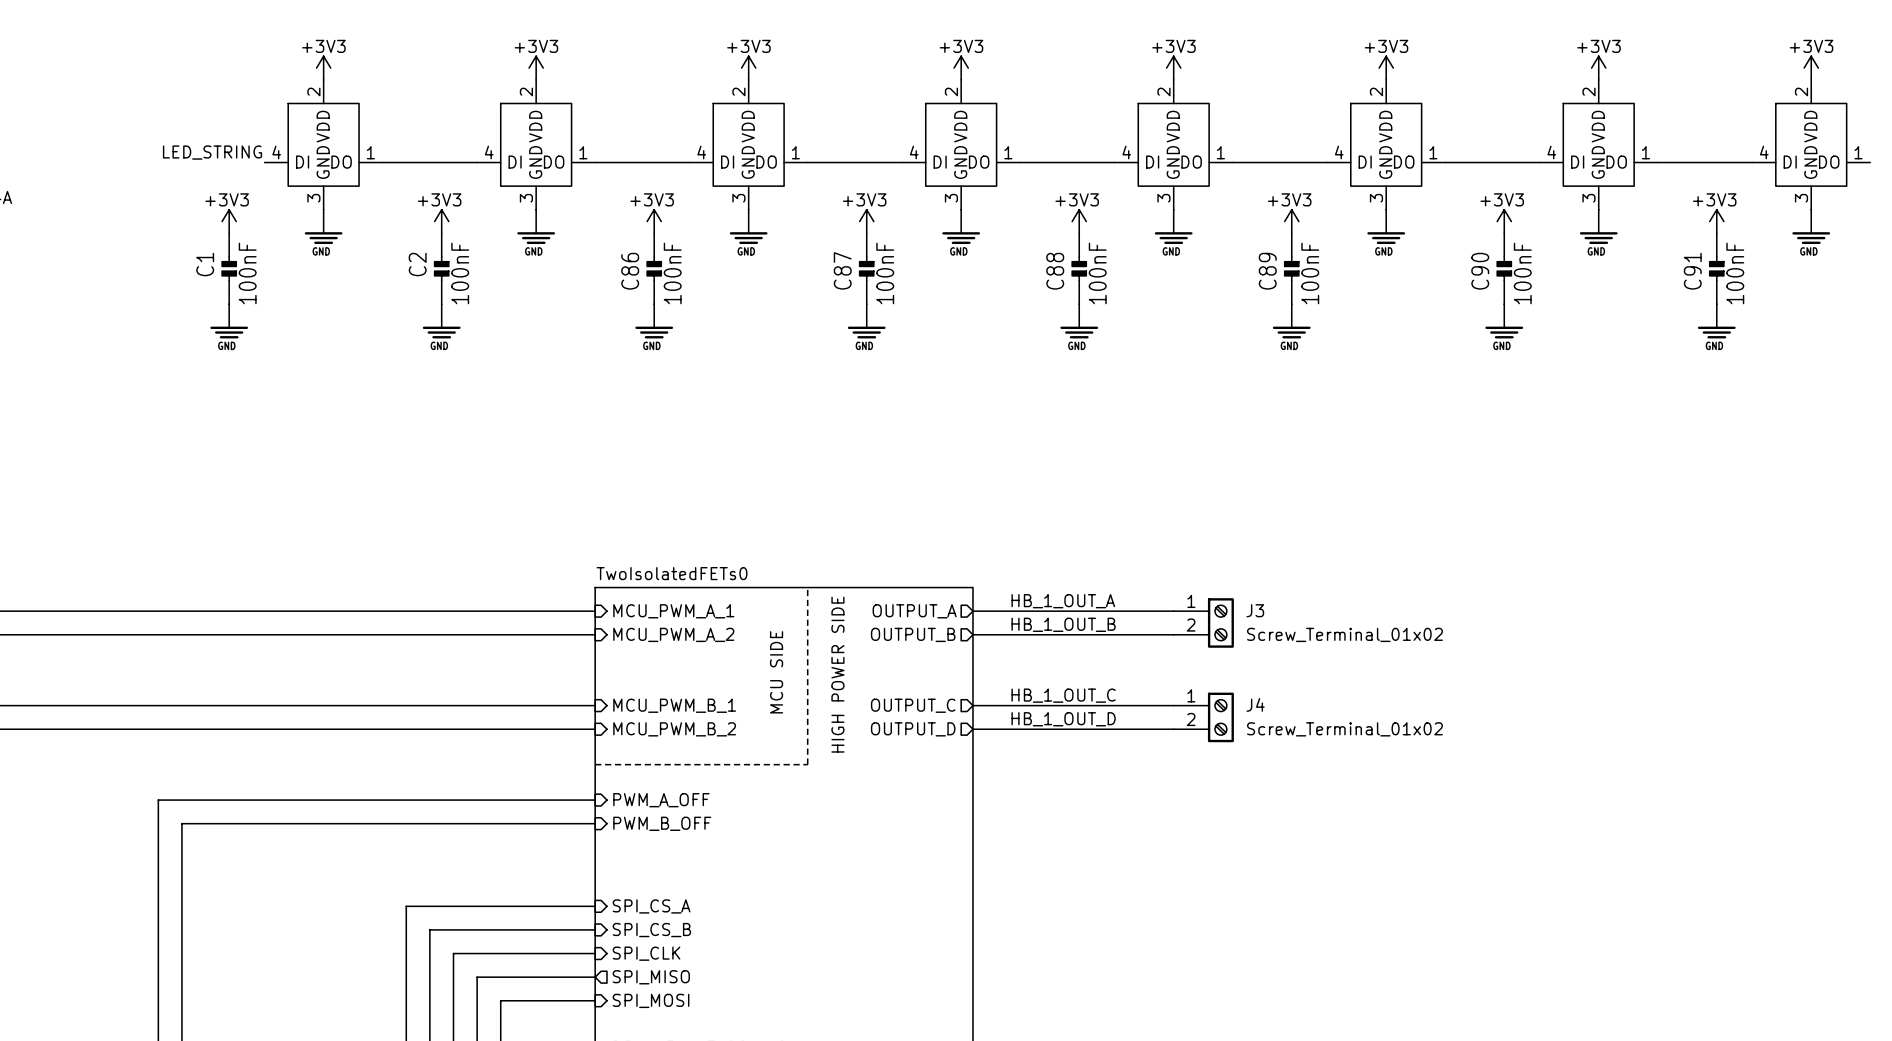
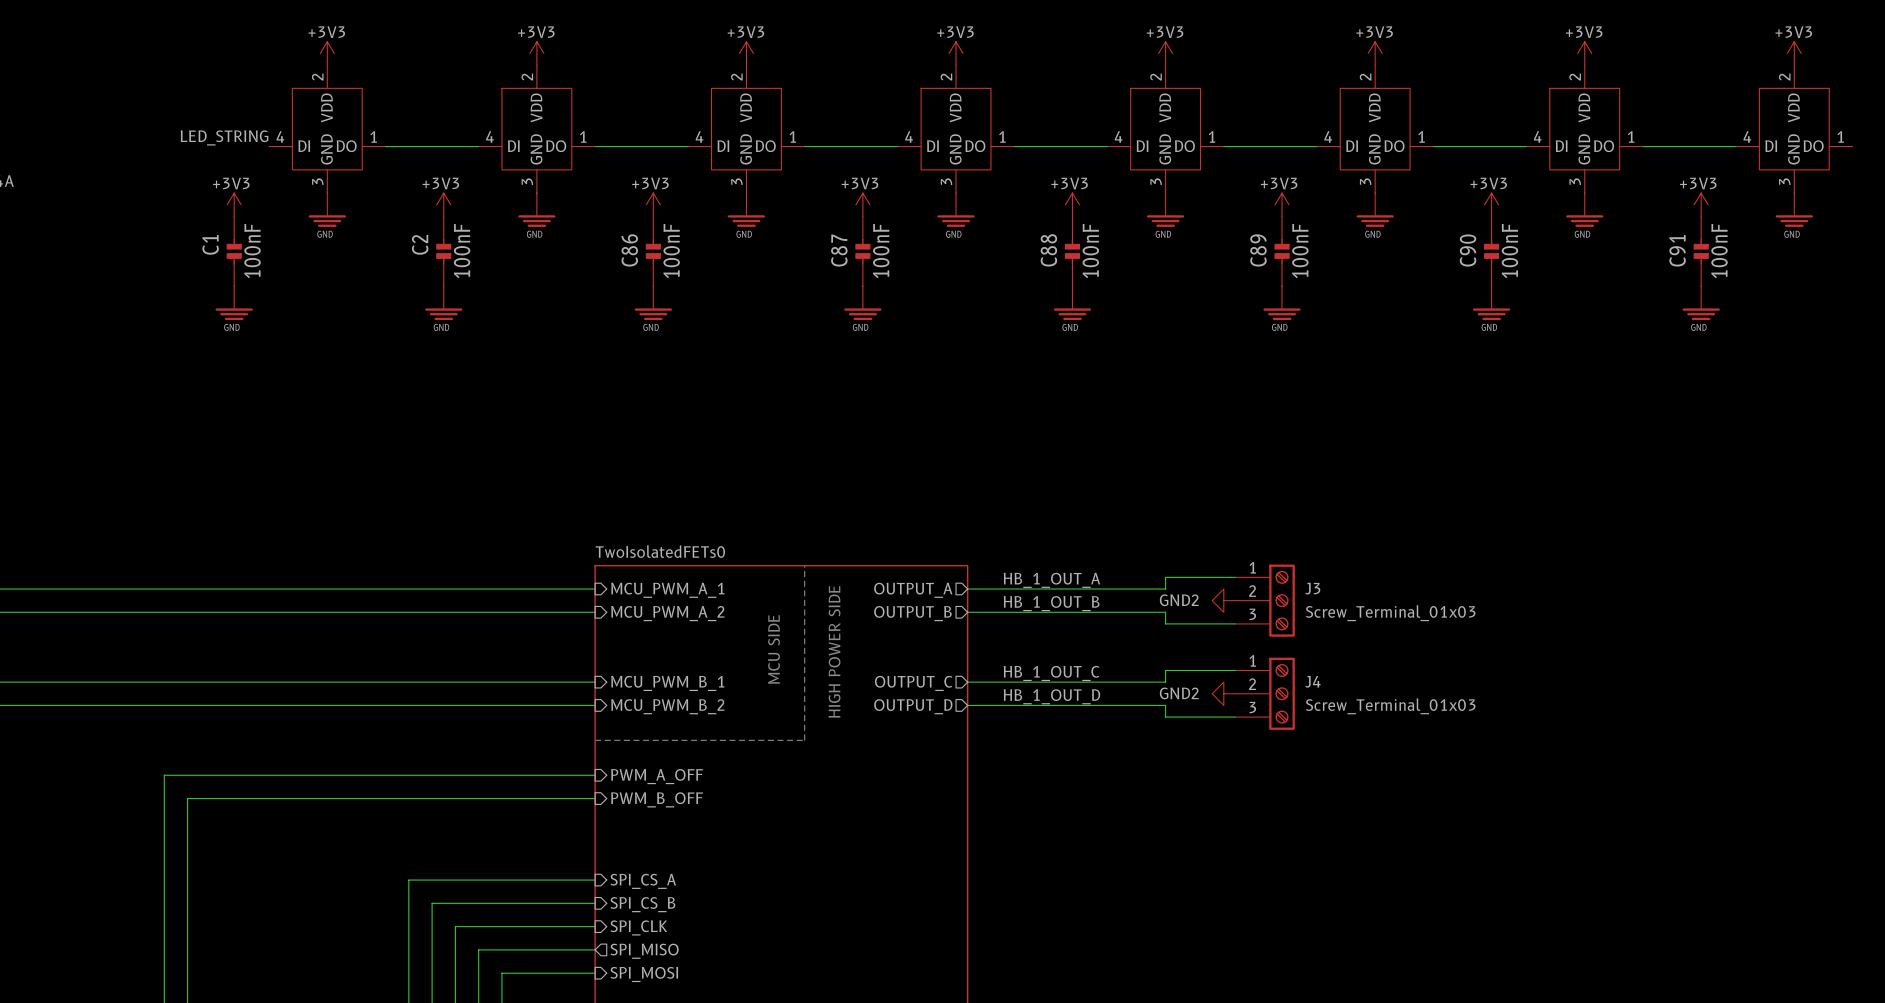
J3 symbol: [1173, 598, 1234, 648] -> [1235, 564, 1295, 637]
wire: none -> (1235, 577) (1165, 577) (1165, 588)
power symbol: none -> GND2 (1223, 600)
wire: none -> (1165, 612) (1165, 623) (1235, 623)
J3 value: Screw_Terminal_01x02 (1344, 634) -> Screw_Terminal_01x03 (1390, 613)
J4 symbol: [1173, 692, 1234, 743] -> [1235, 657, 1295, 730]
wire: none -> (1235, 670) (1165, 670) (1165, 682)
power symbol: none -> GND2 (1223, 693)
wire: none -> (1165, 705) (1165, 717) (1235, 717)
J4 value: Screw_Terminal_01x02 (1344, 729) -> Screw_Terminal_01x03 (1390, 706)

